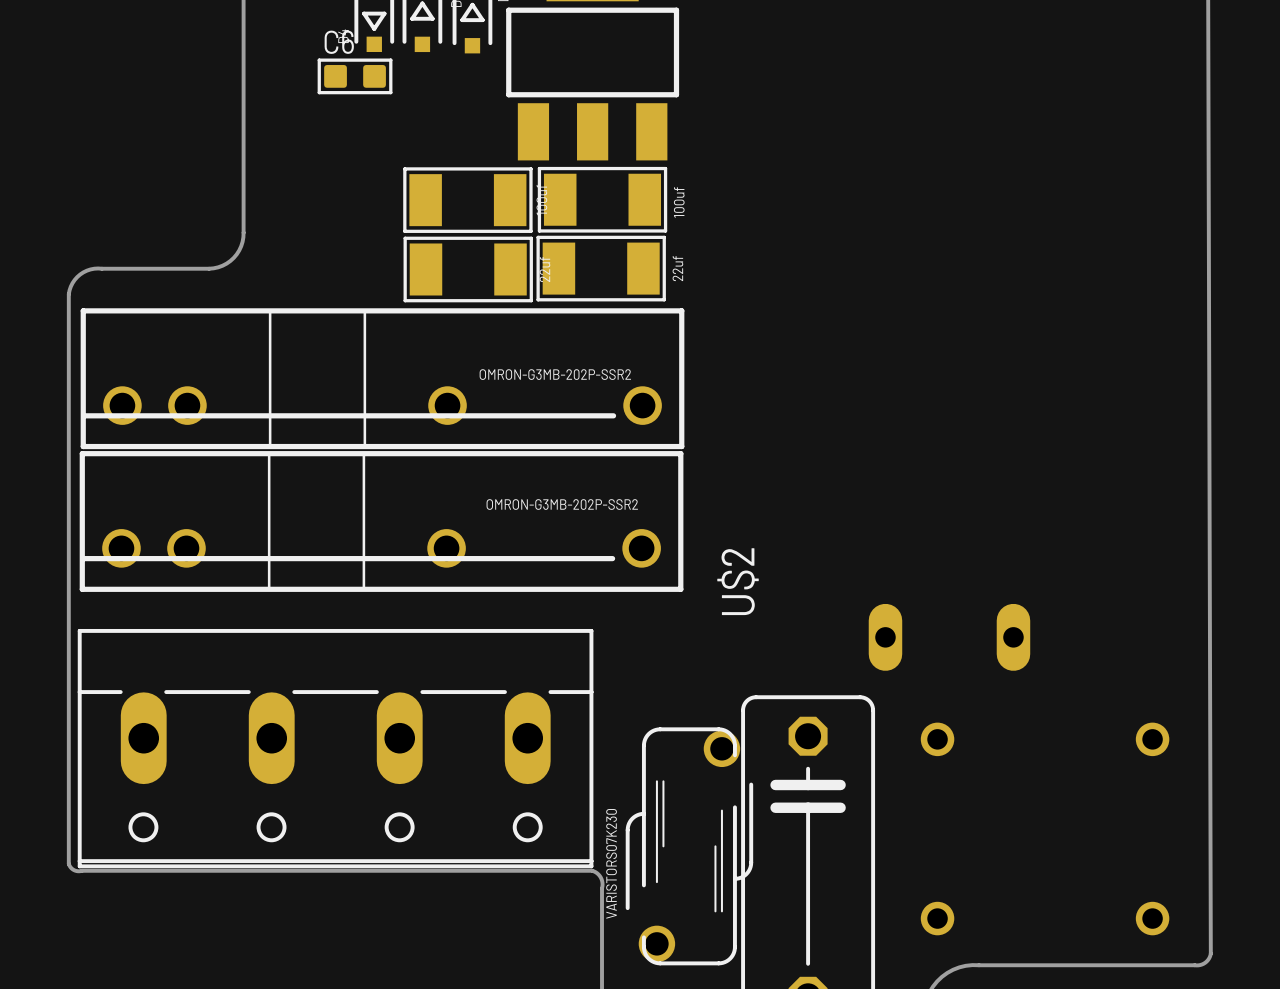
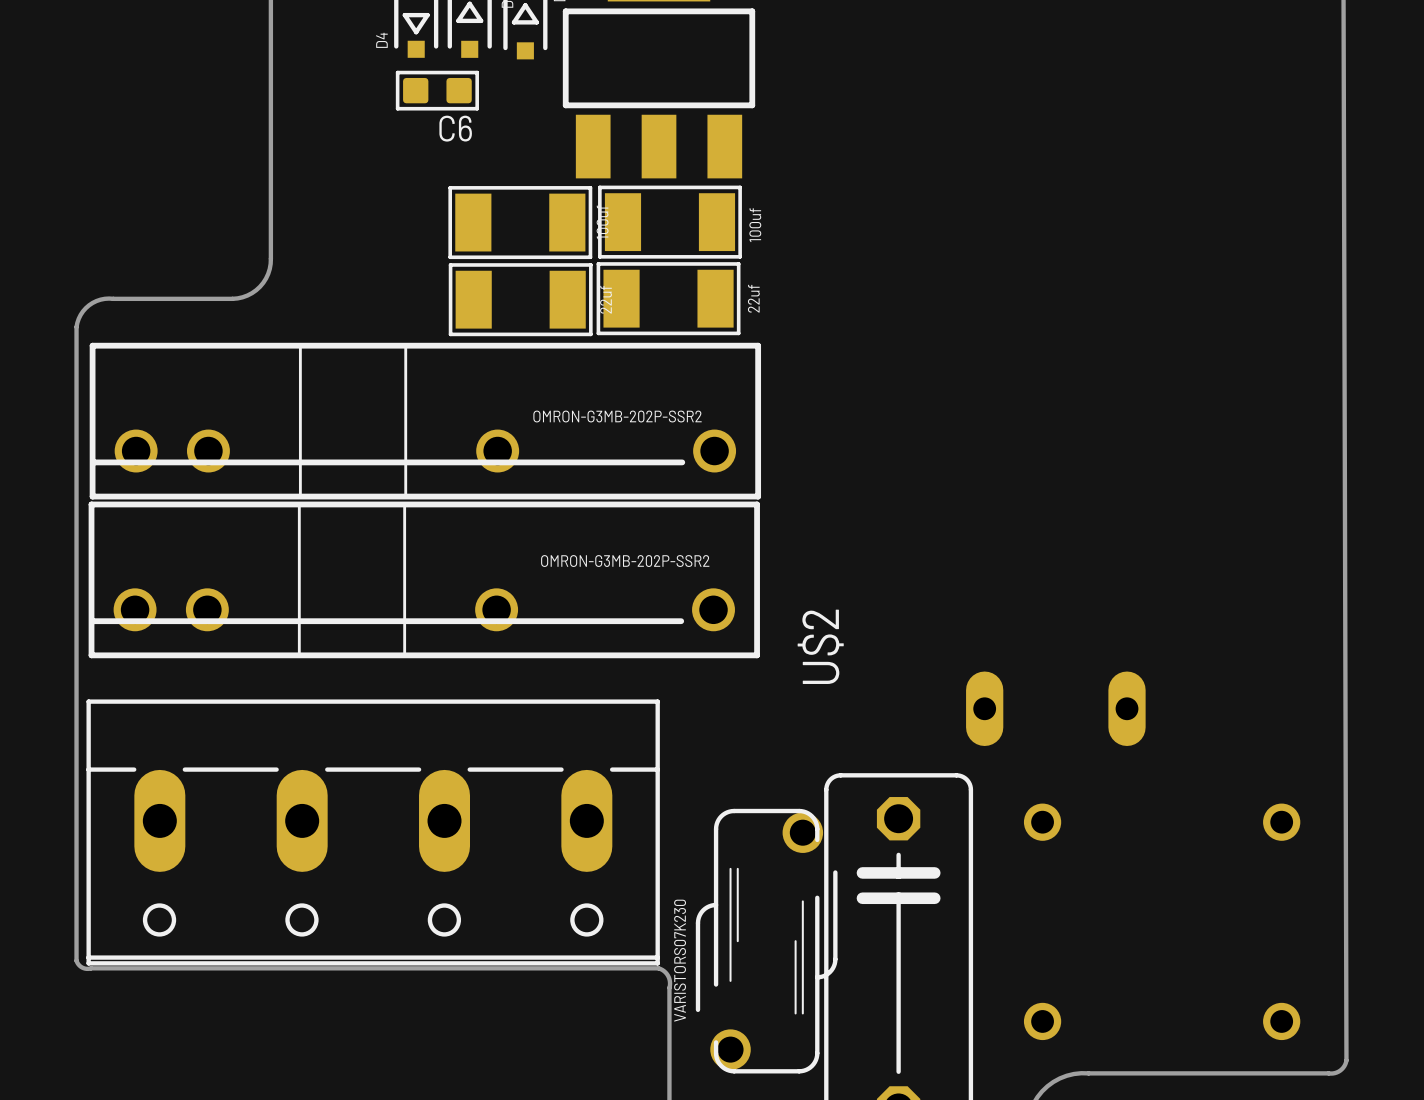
C6 name position: C6 (339, 42) -> C6 (455, 128)
C6 position: (355, 76) -> (437, 90)

